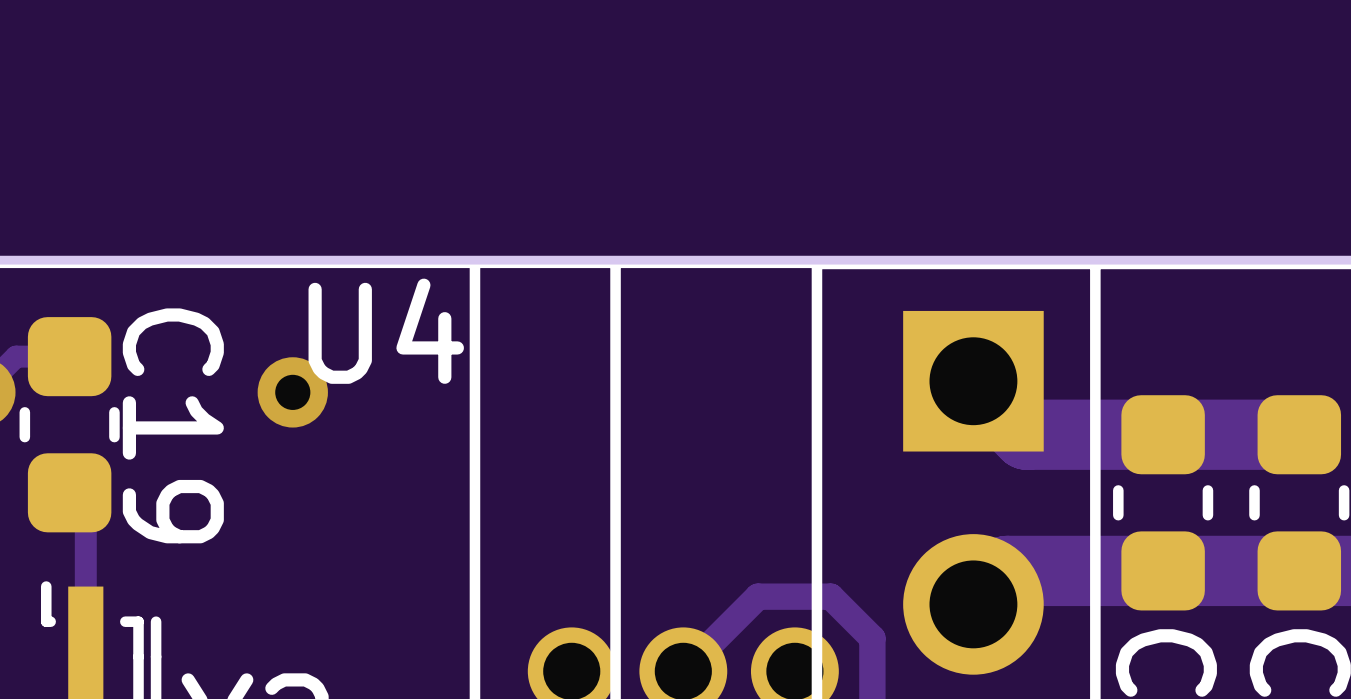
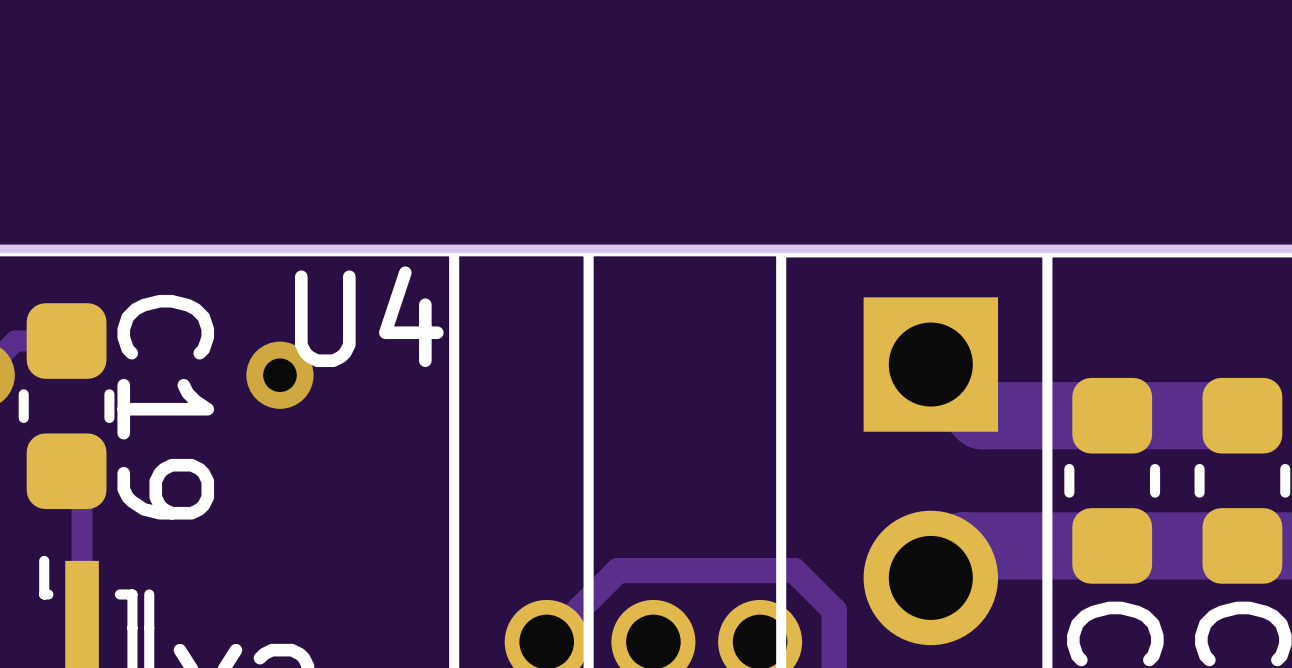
track: (758, 596) (683, 671) -> (724, 570) (618, 570) (546, 641)

